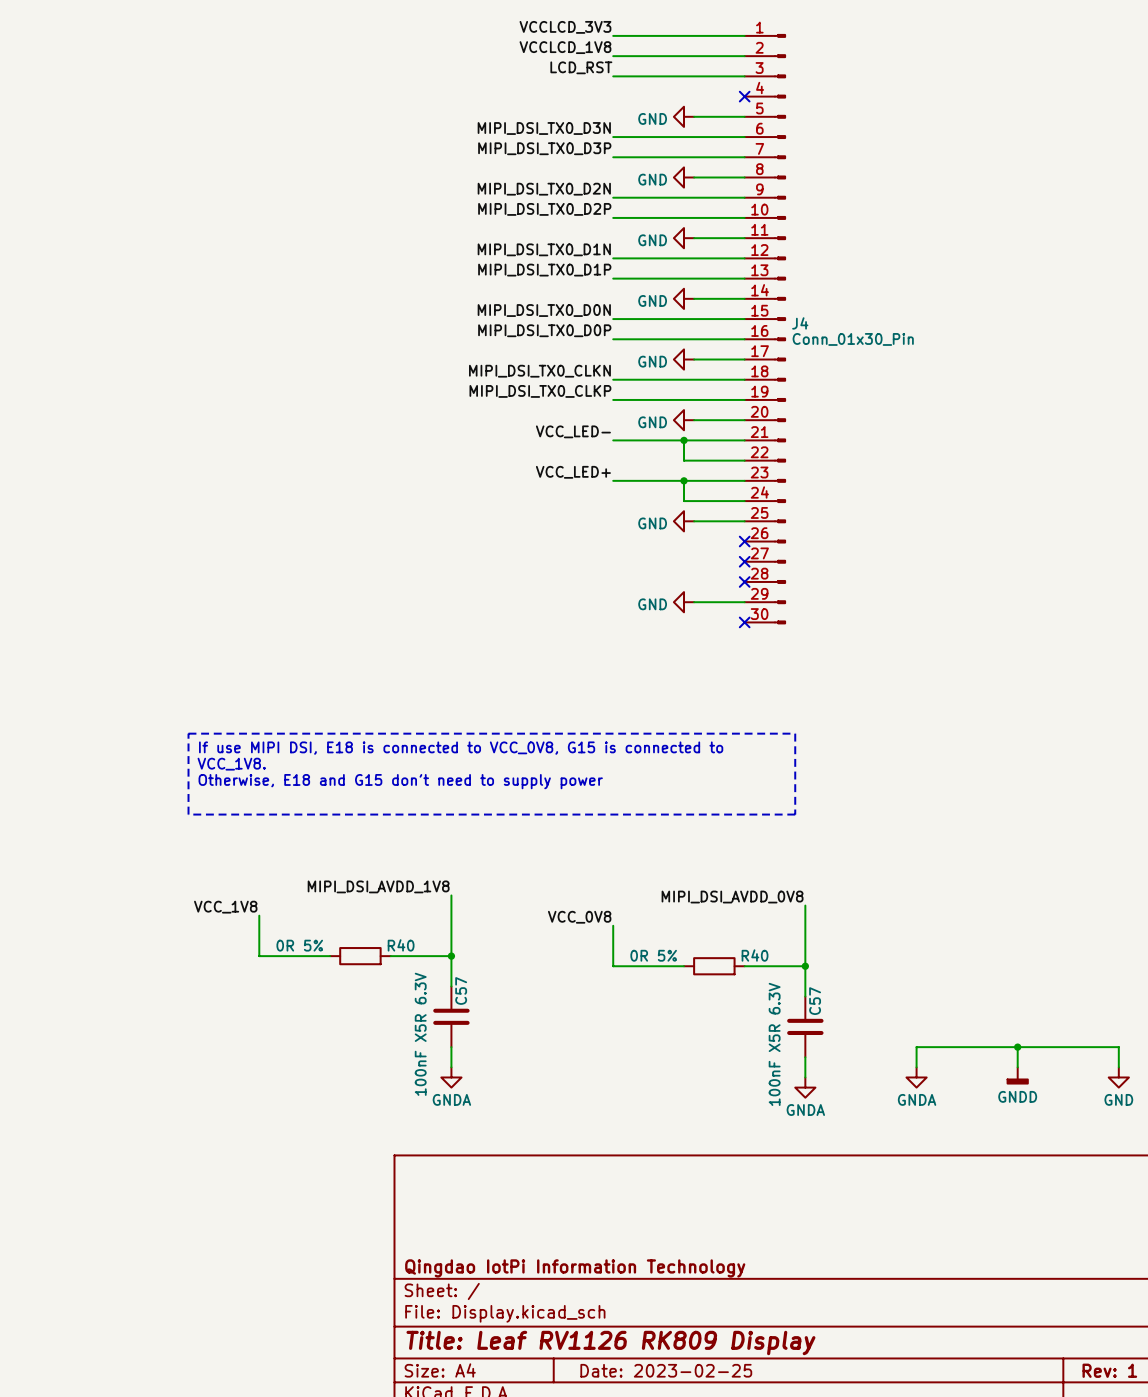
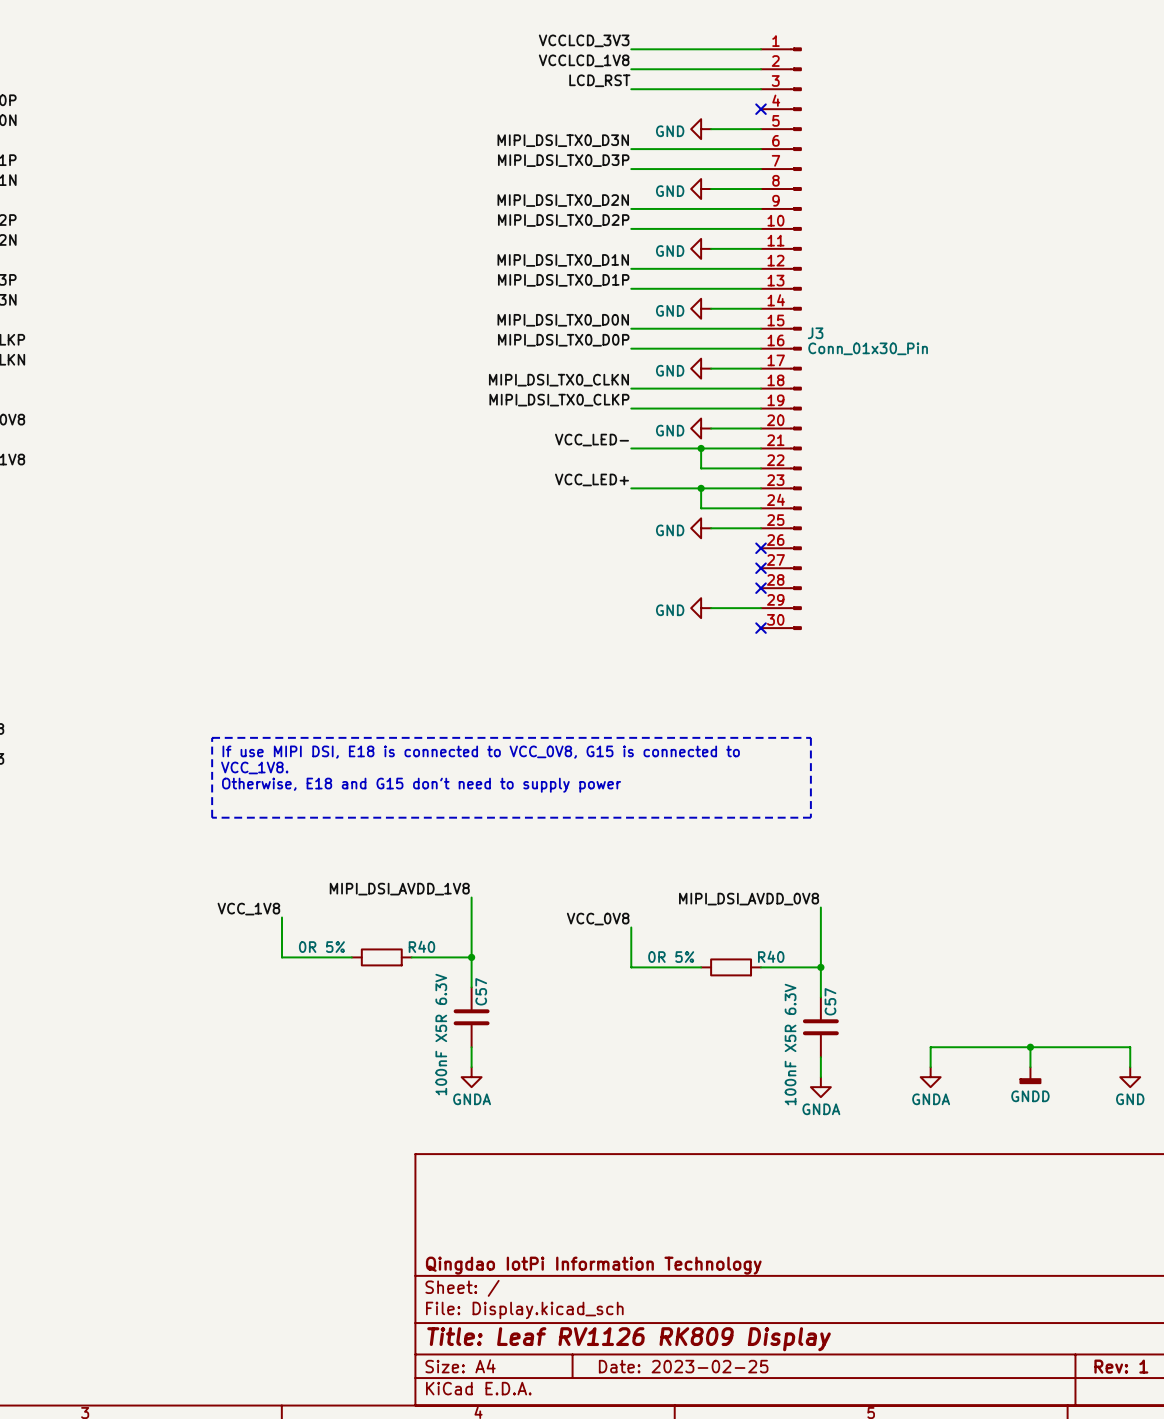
J4 name: J4 (800, 323) -> J3 (815, 333)

